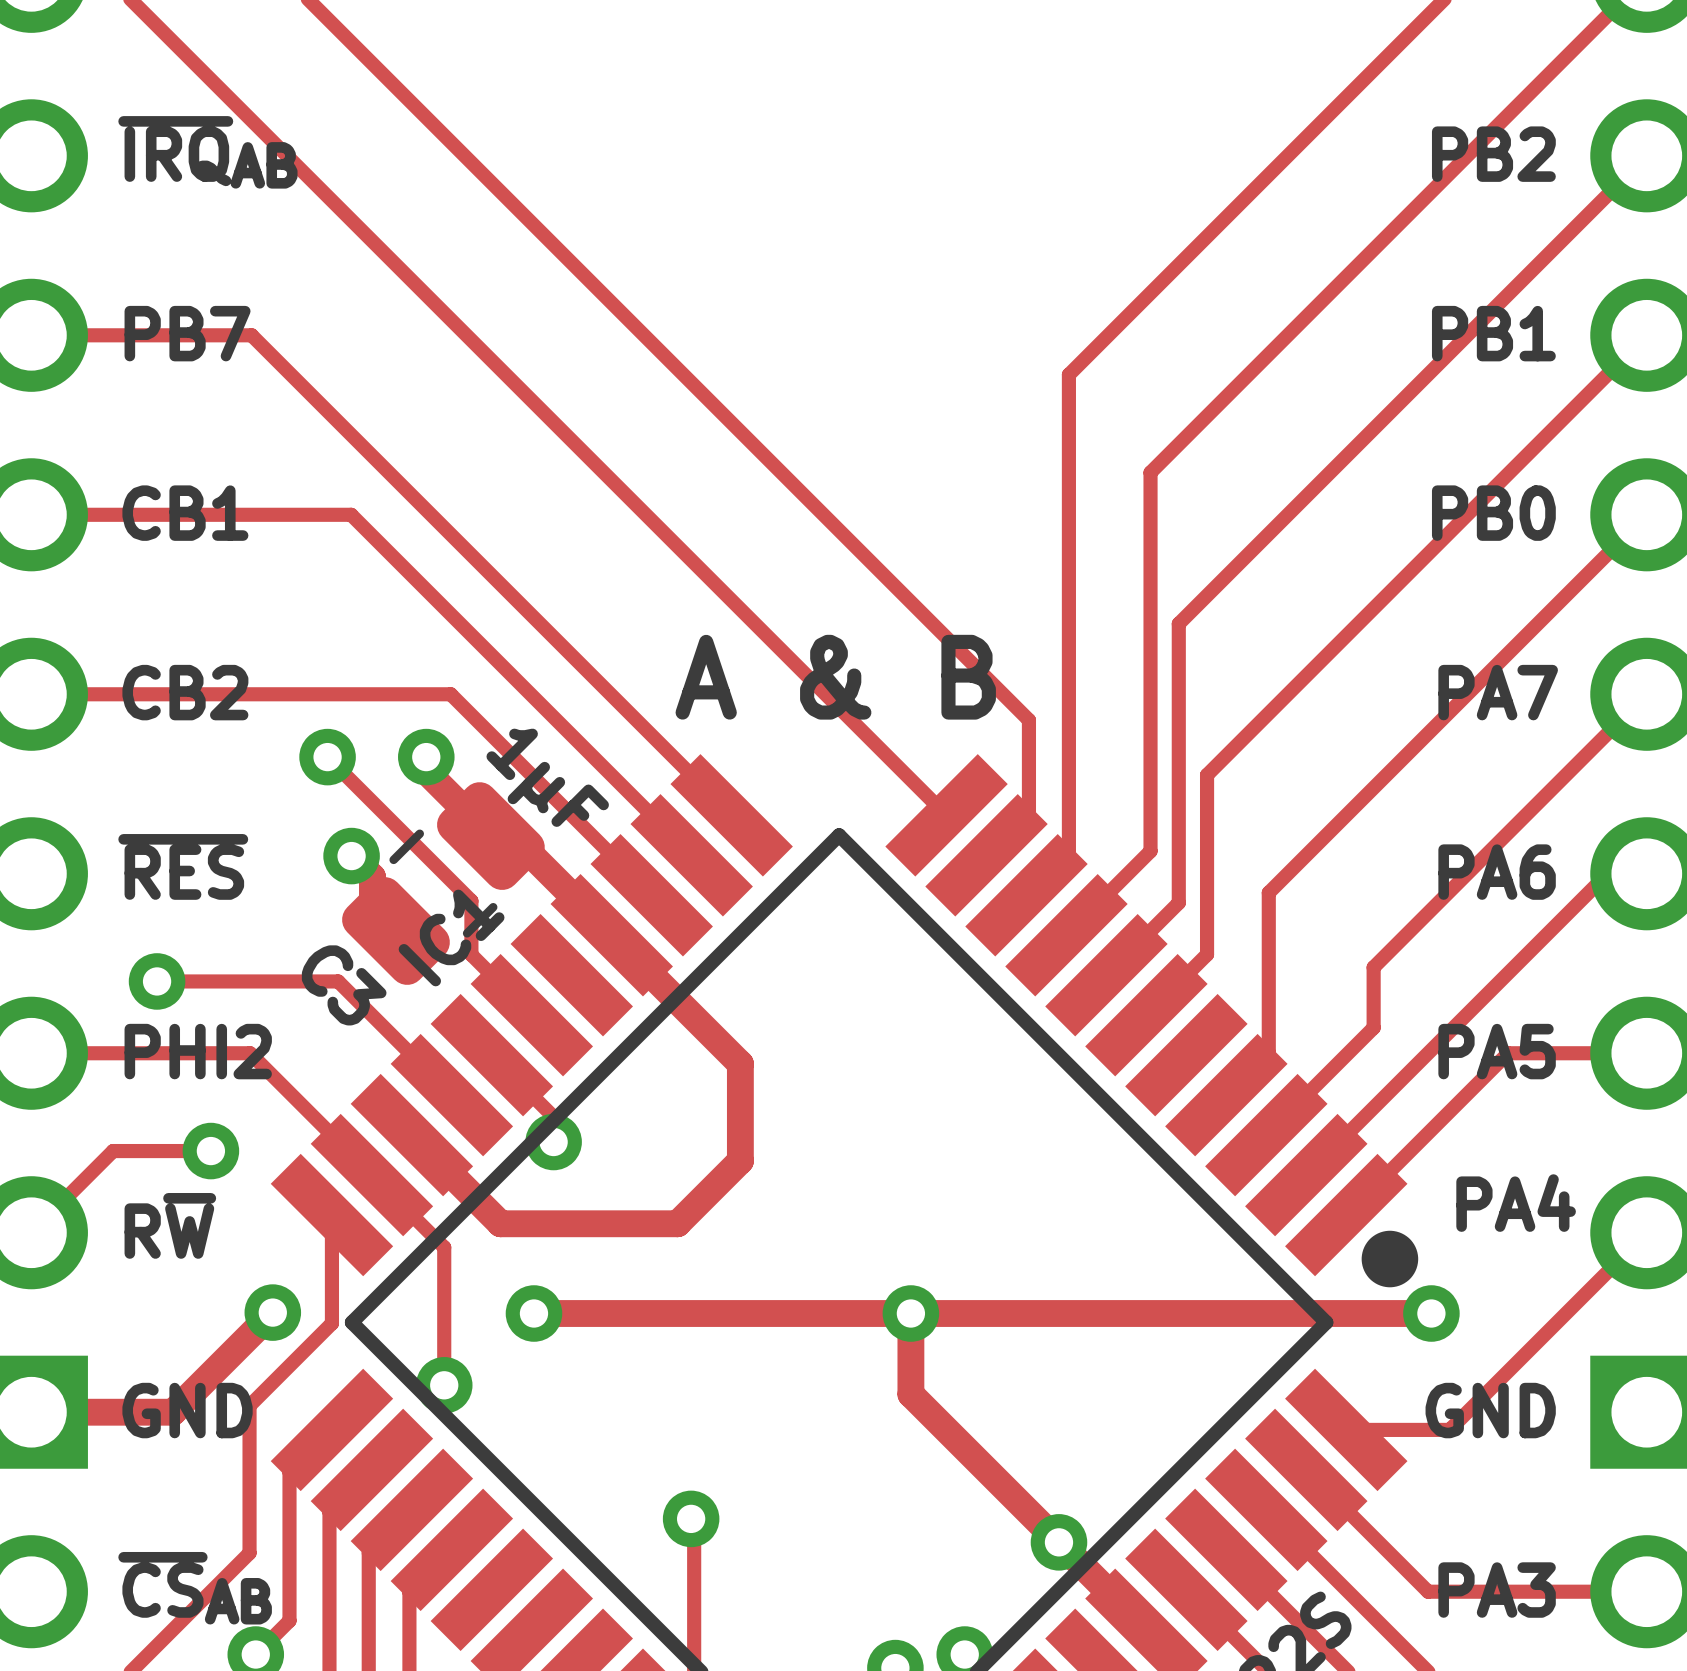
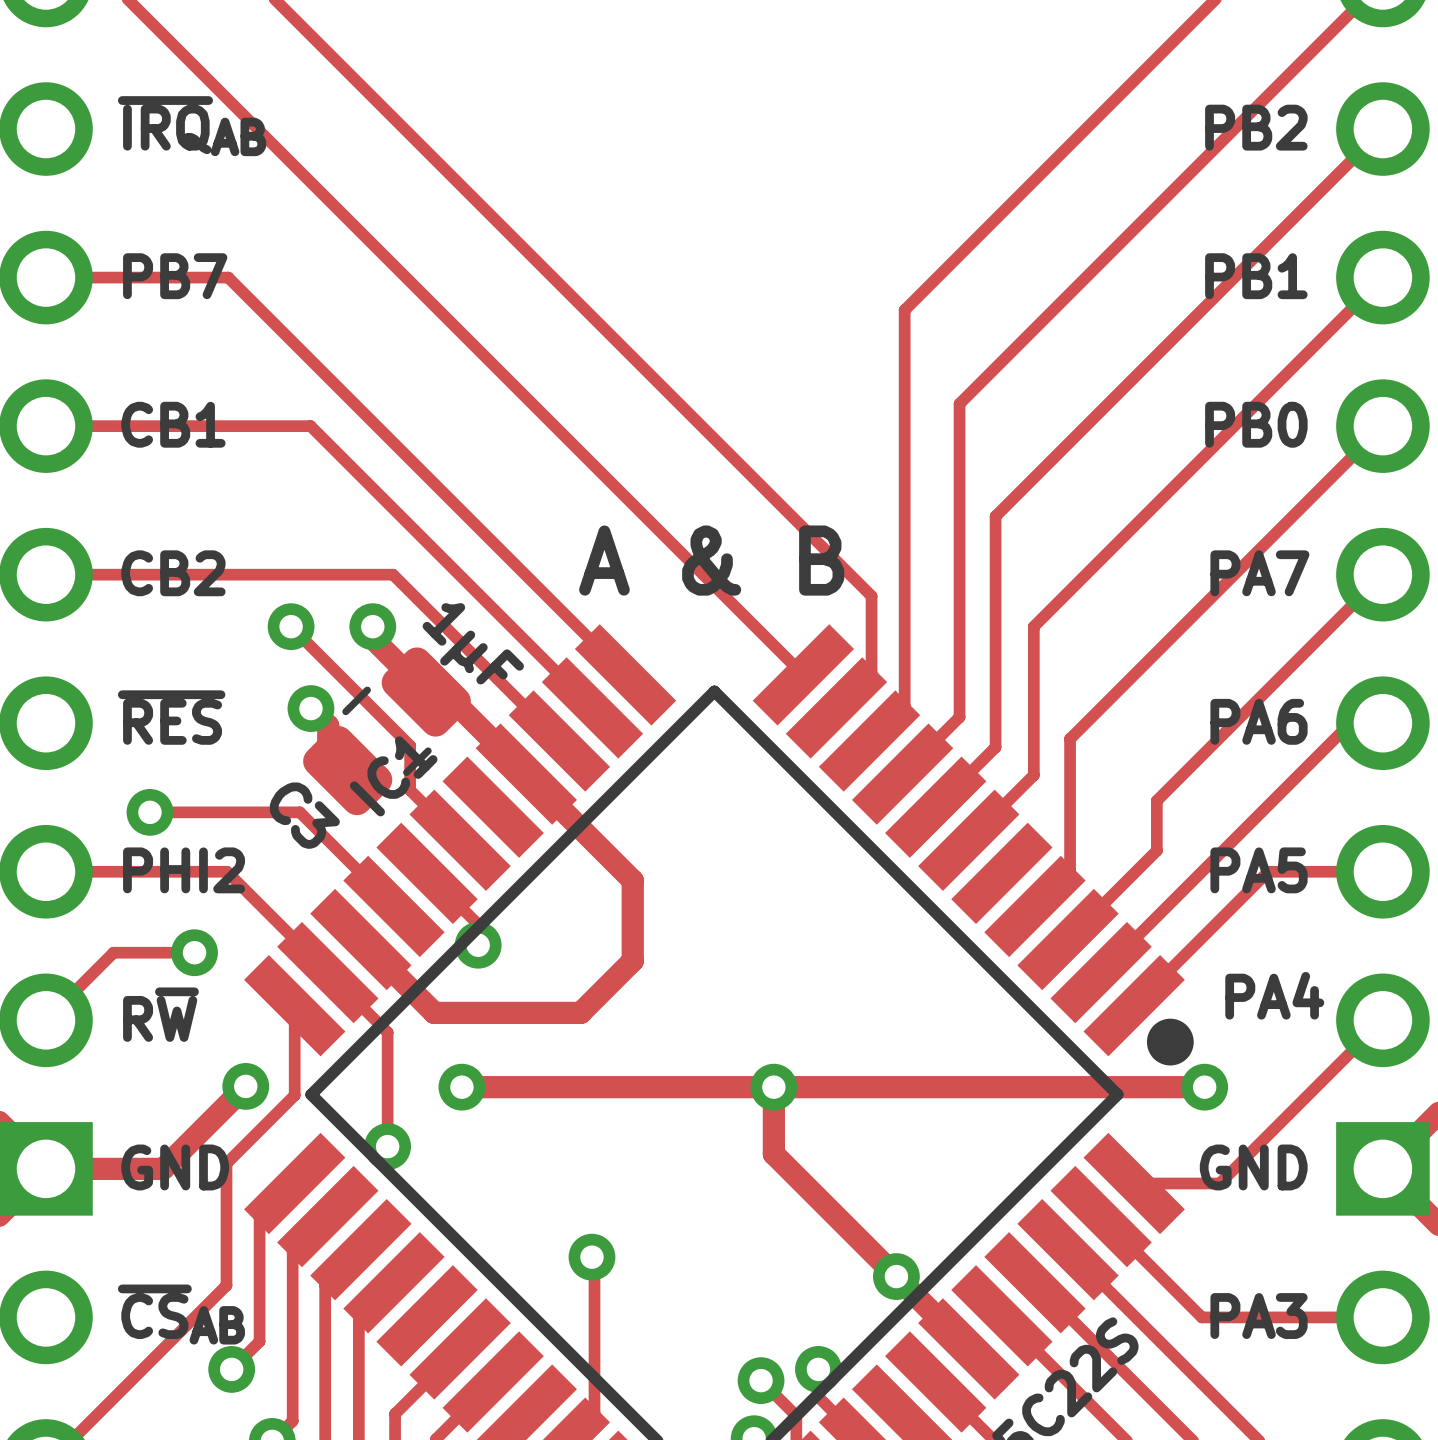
track: (1150, 472) (1150, 851) (1135, 866) -> (972, 391) (959, 403) (959, 717)
track: (1225, 757) (1207, 775) (1207, 954) -> (1033, 626) (1033, 775) (1018, 790)

